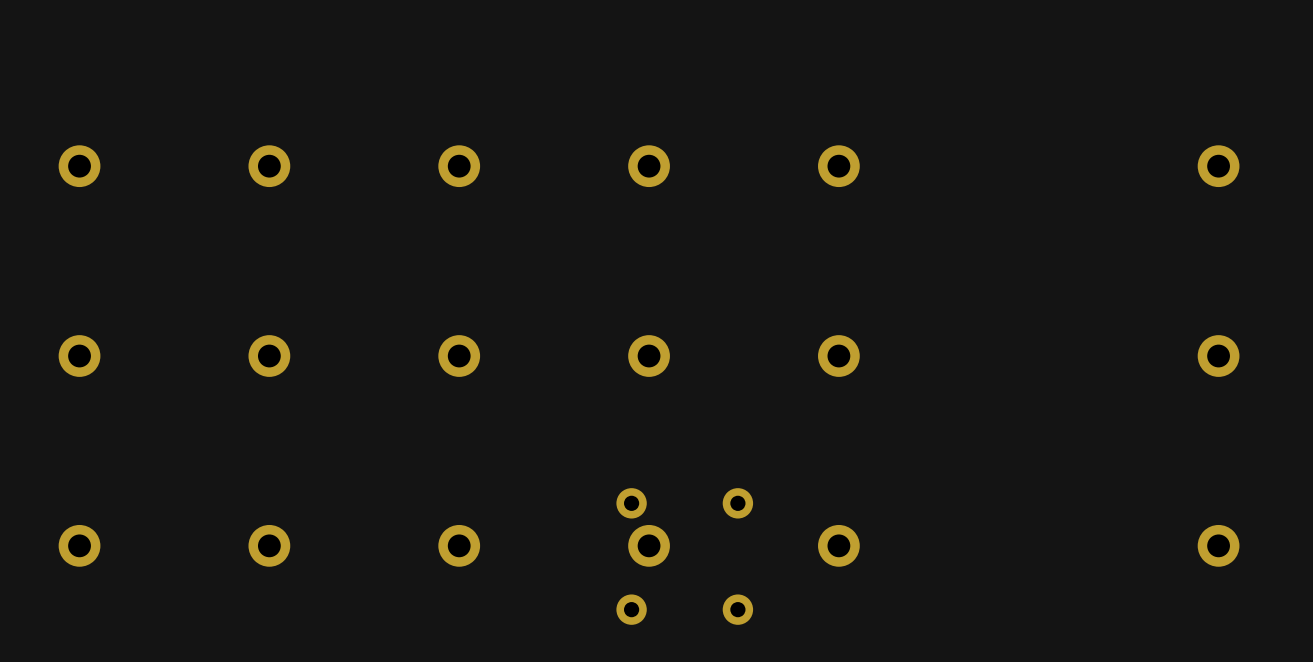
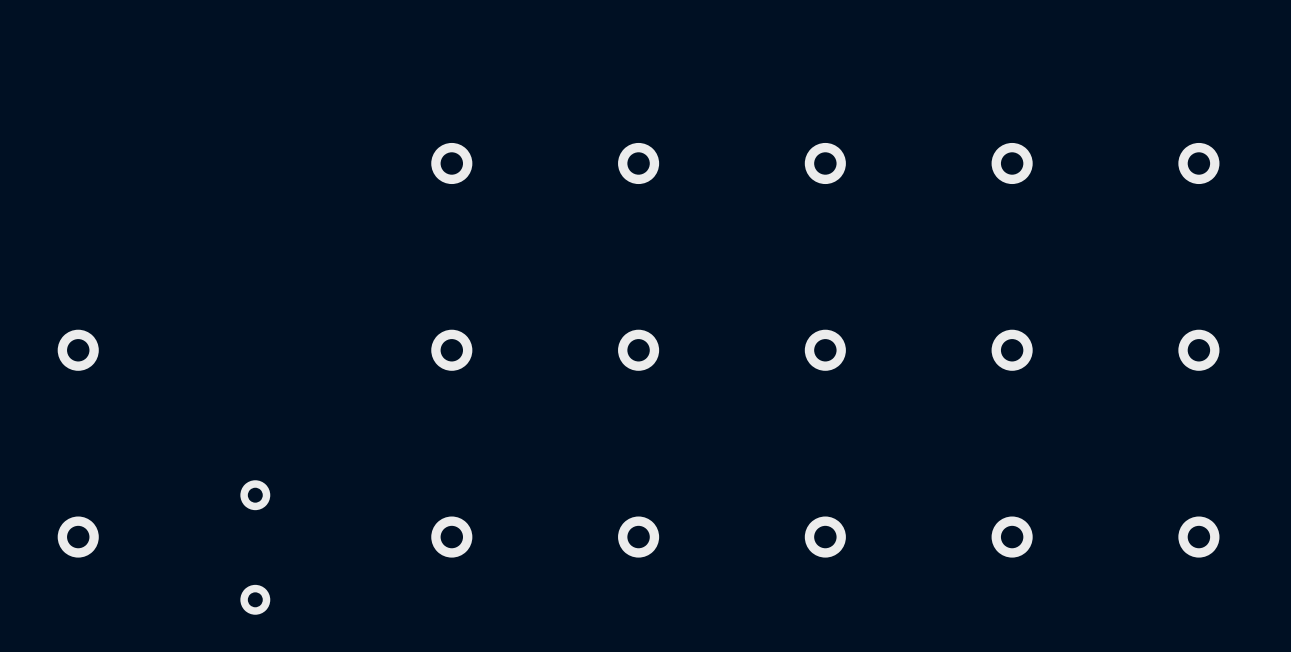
via: (79, 166) -> none
via: (269, 166) -> none
via: none -> (1012, 163)
via: (269, 356) -> none
via: none -> (1012, 350)
via: none -> (255, 495)
via: (631, 503) -> none
via: (737, 503) -> none
via: (269, 545) -> none
via: none -> (1012, 537)
via: none -> (255, 599)
via: (631, 609) -> none
via: (737, 609) -> none

